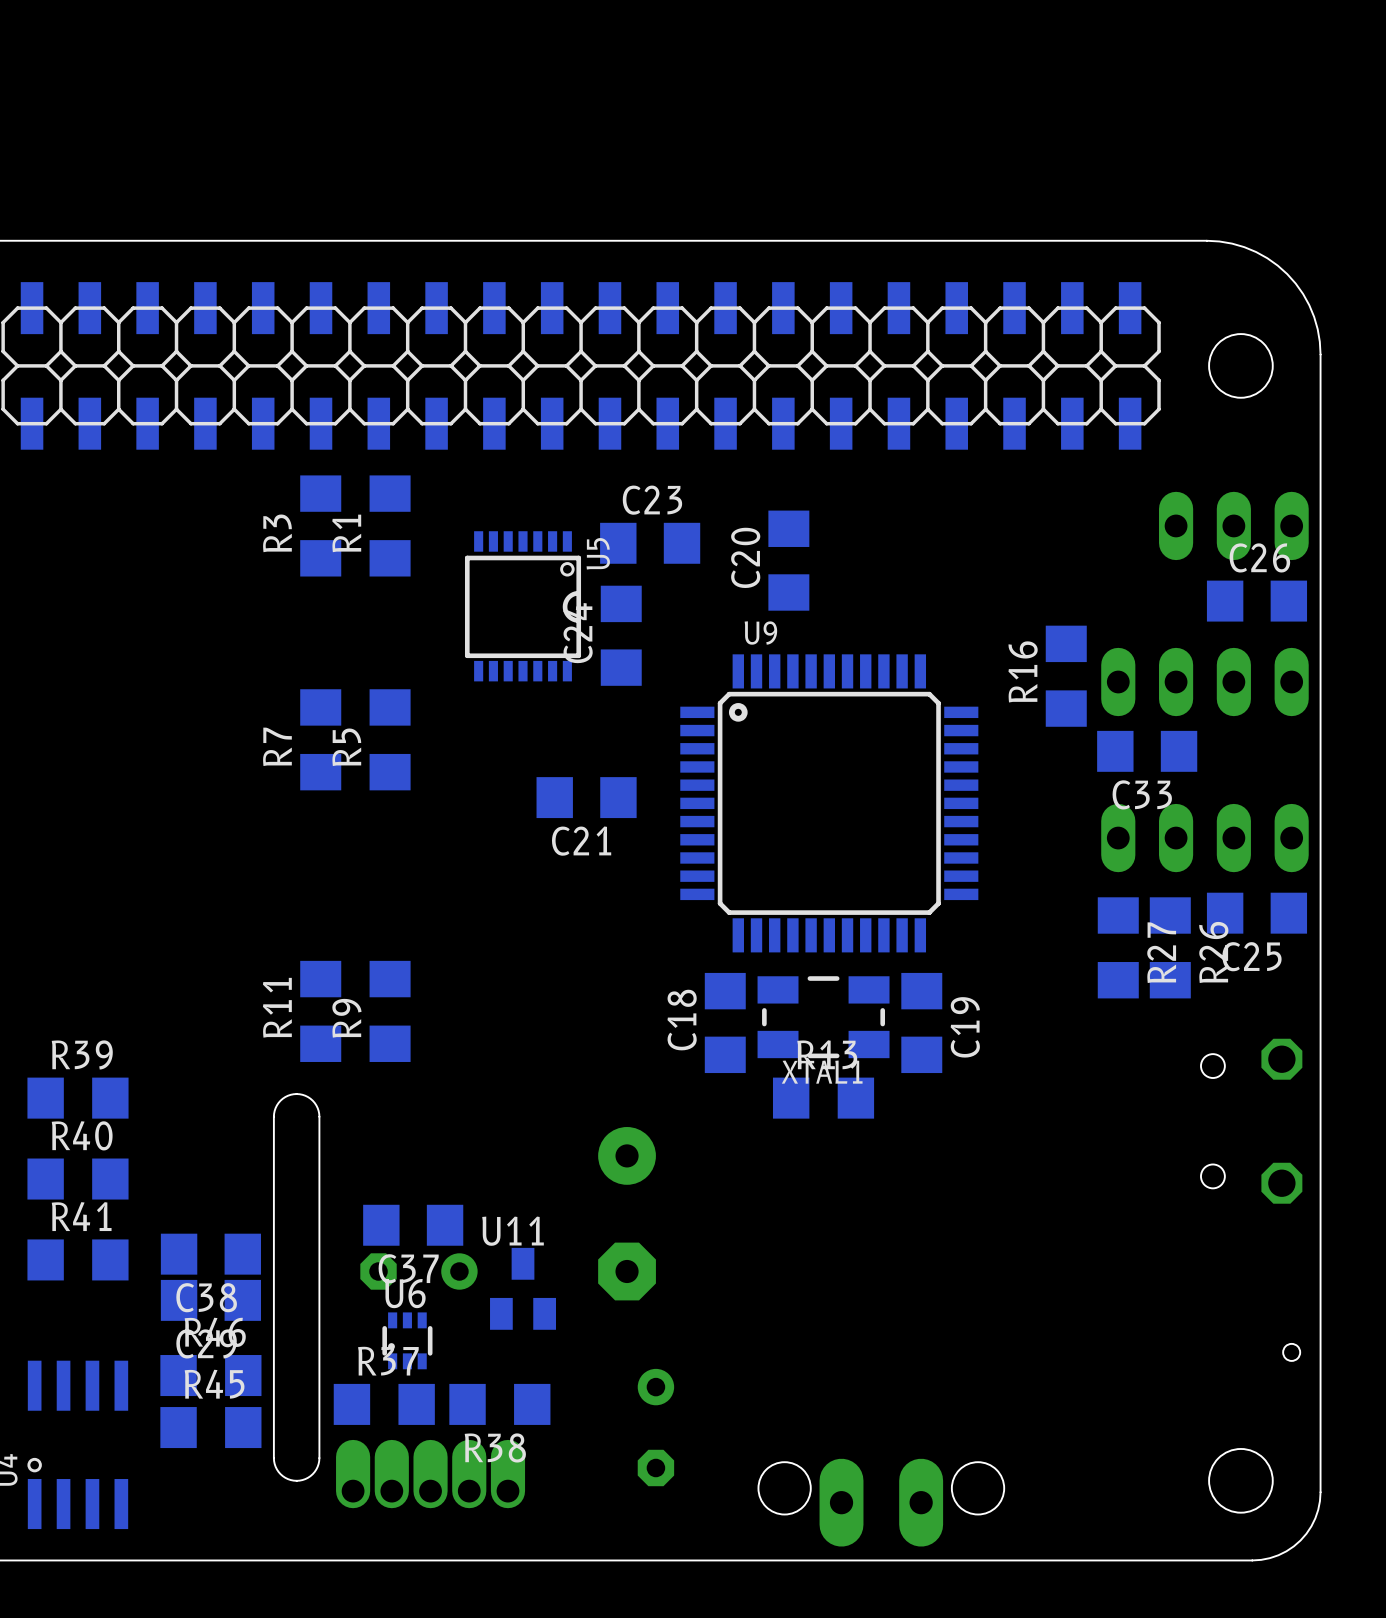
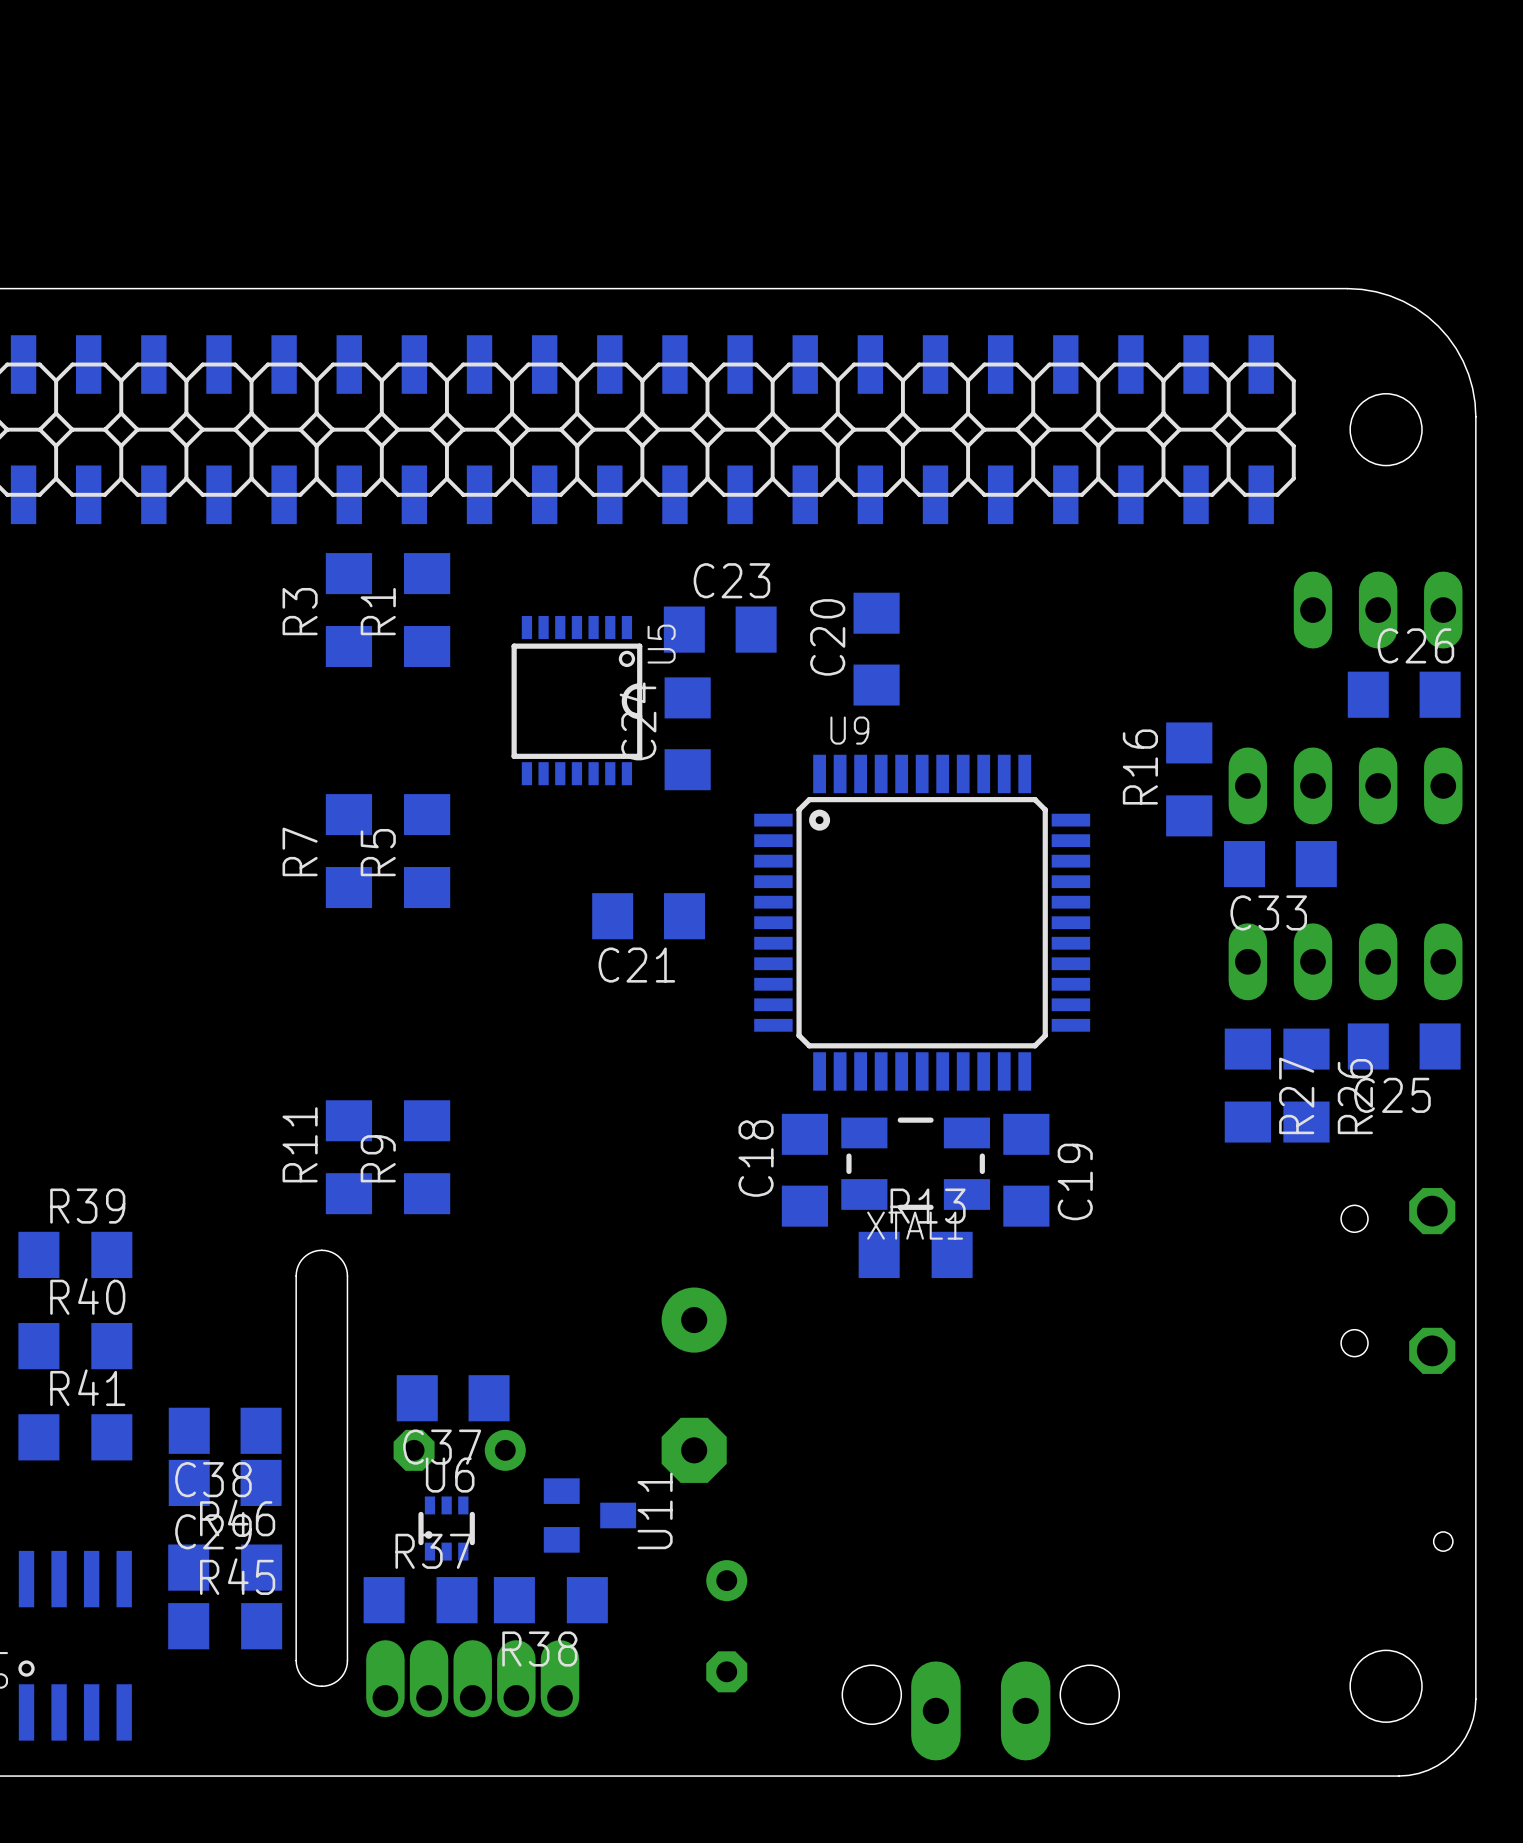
U11 rotation: 0° (523, 1288) -> 90° clockwise (589, 1515)

